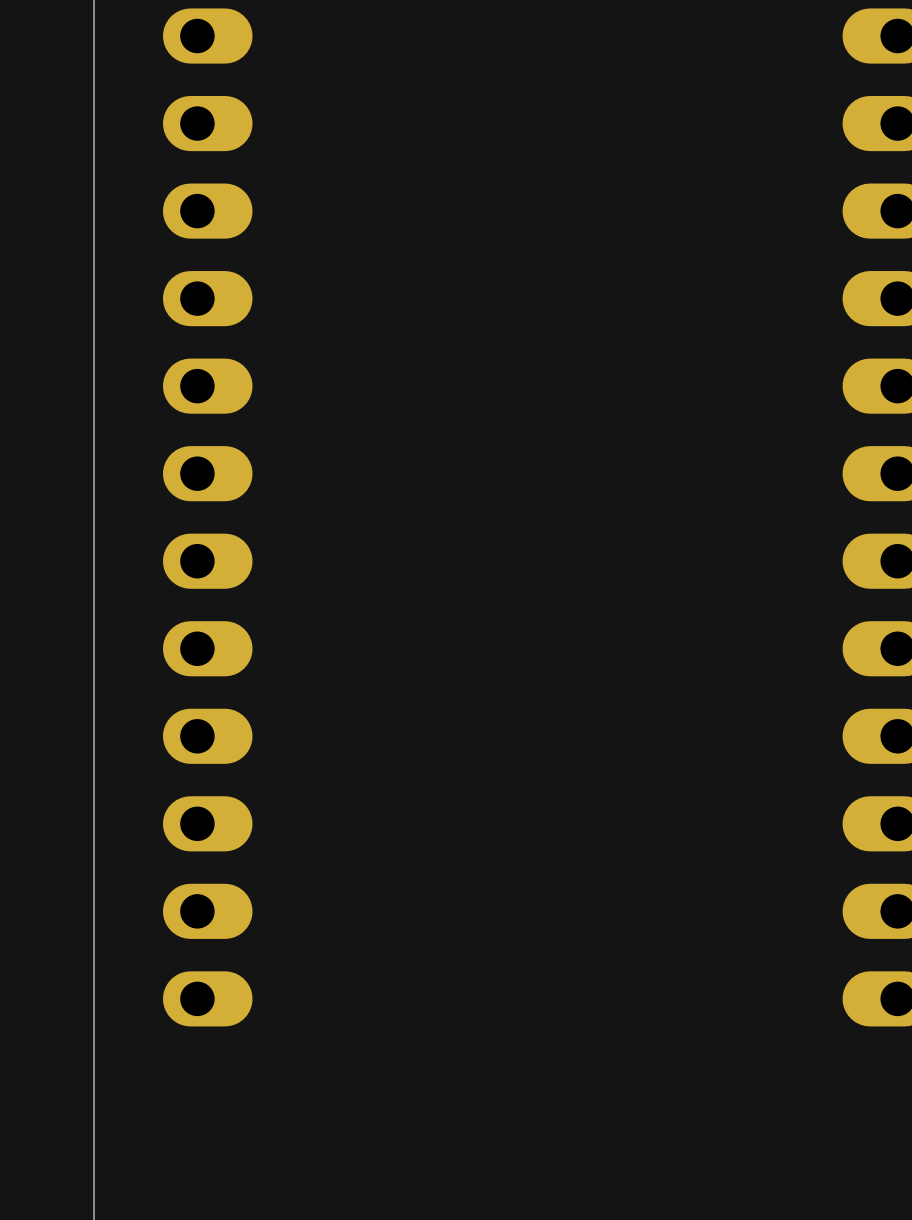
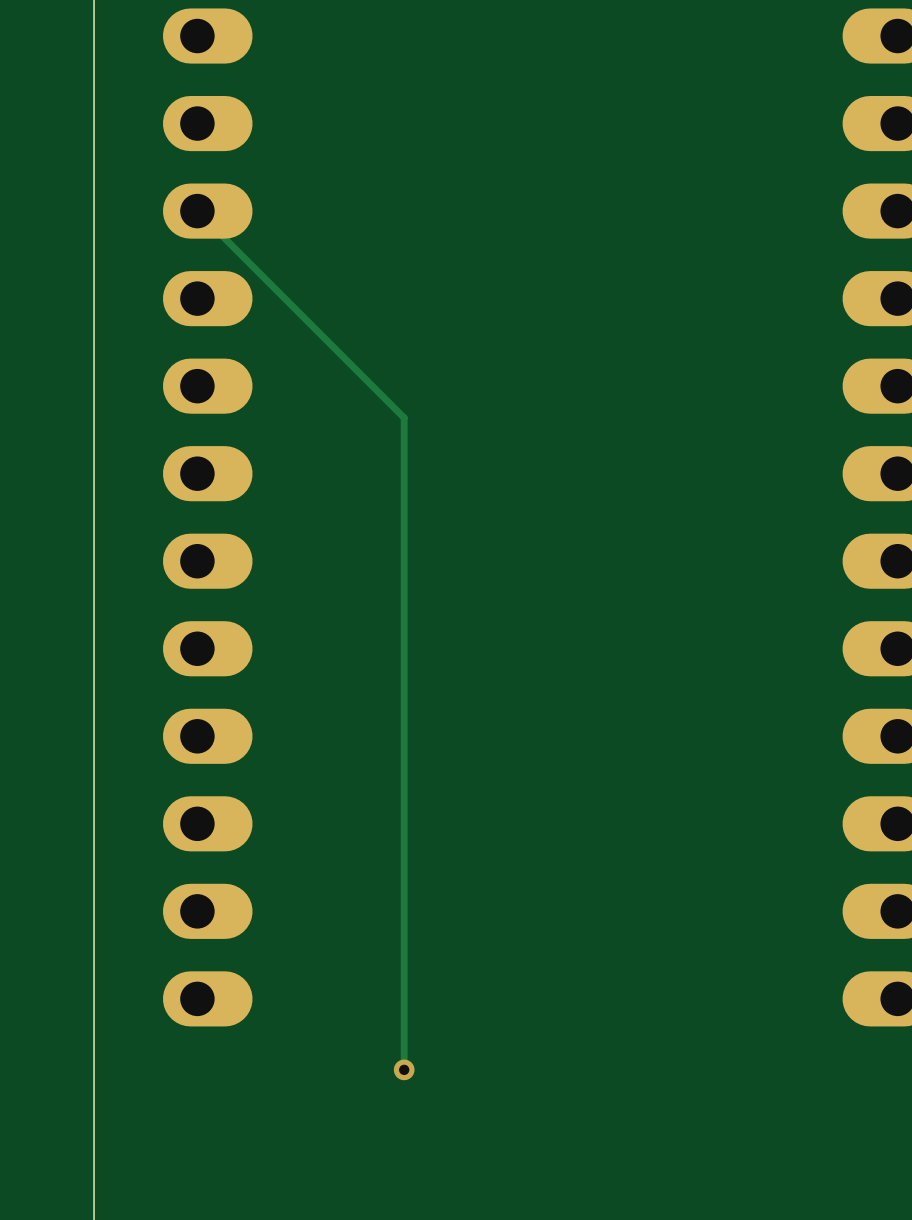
track: none -> (197, 211) (404, 417) (404, 1069)
via: none -> (404, 1069)

